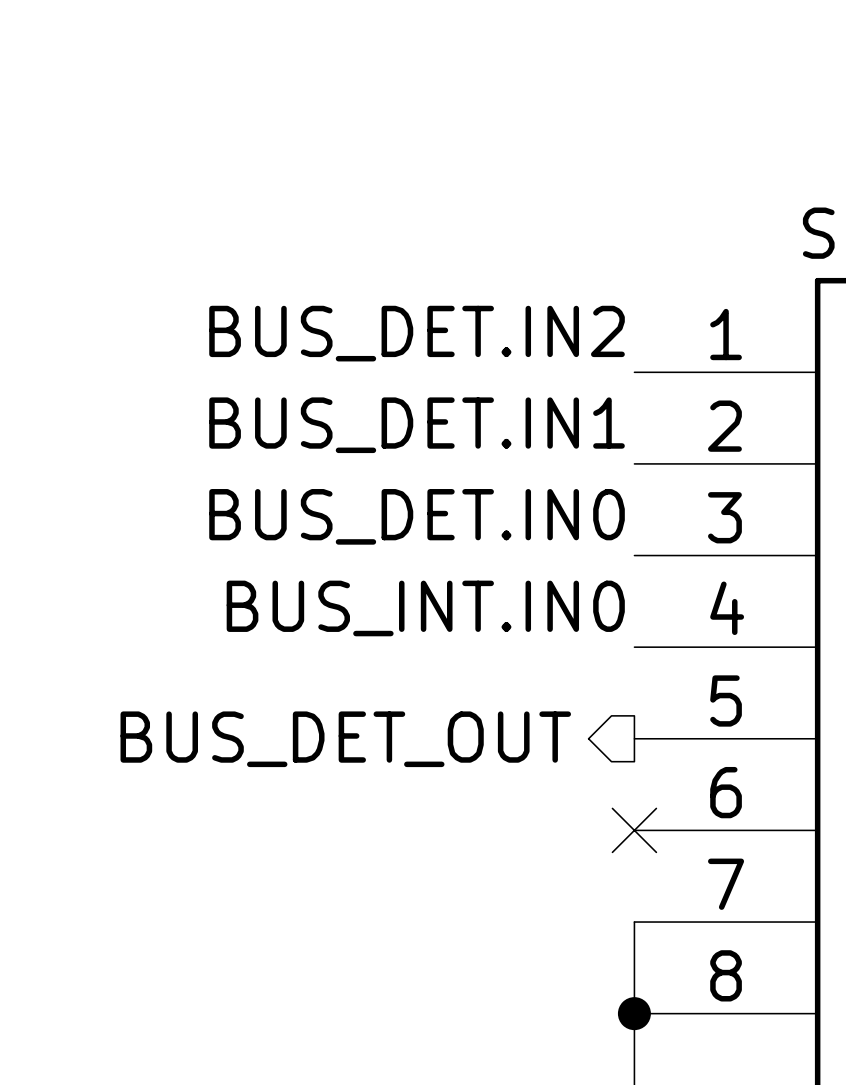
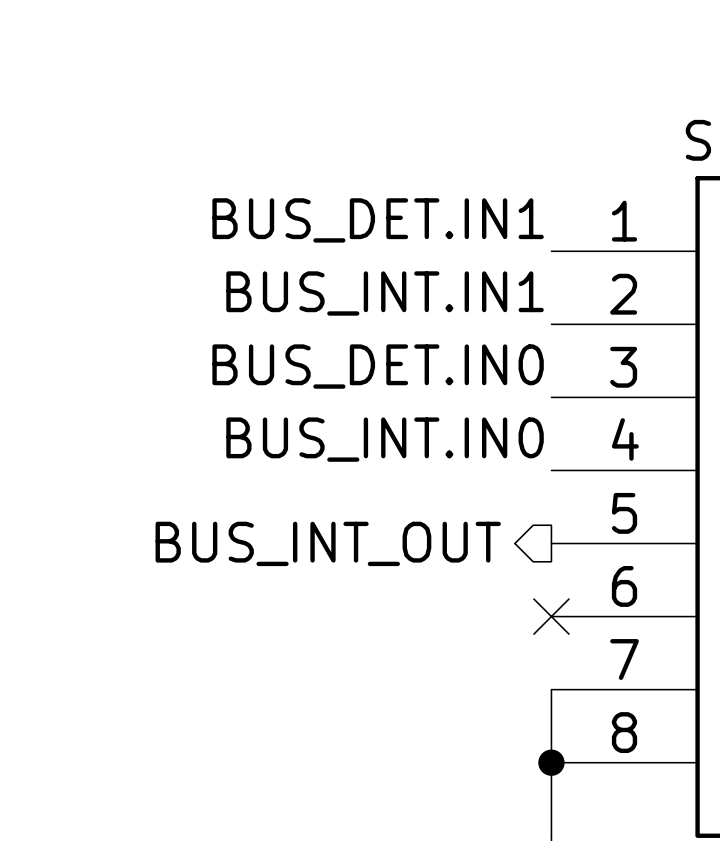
label: BUS_DET.IN2 (417, 333) -> BUS_DET.IN1 (378, 220)
label: BUS_DET.IN1 (417, 425) -> BUS_INT.IN1 (385, 293)
hierarchical label: BUS_DET_OUT (345, 739) -> BUS_INT_OUT (328, 543)

